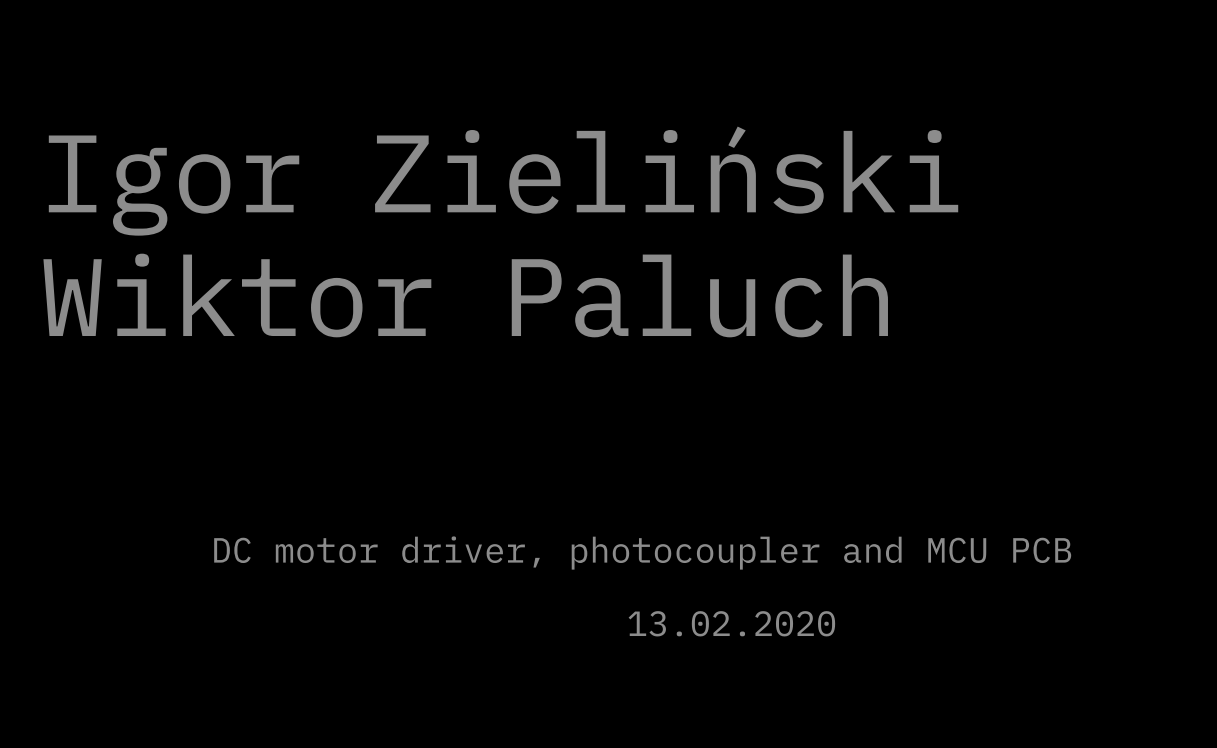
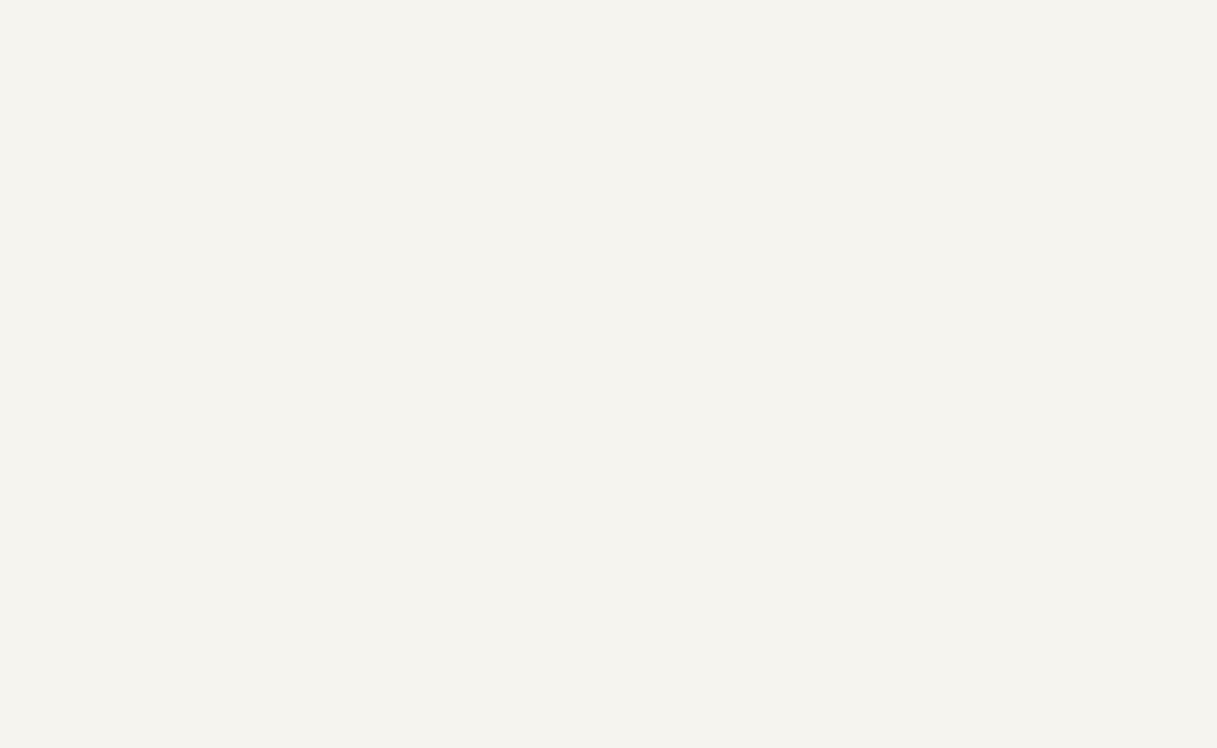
text: Igor Zieliński (503, 181) -> none
text: Wiktor Paluch (465, 295) -> none
text: DC motor driver, photocoupler and MCU PCB (642, 553) -> none
text: 13.02.2020 (731, 623) -> none

